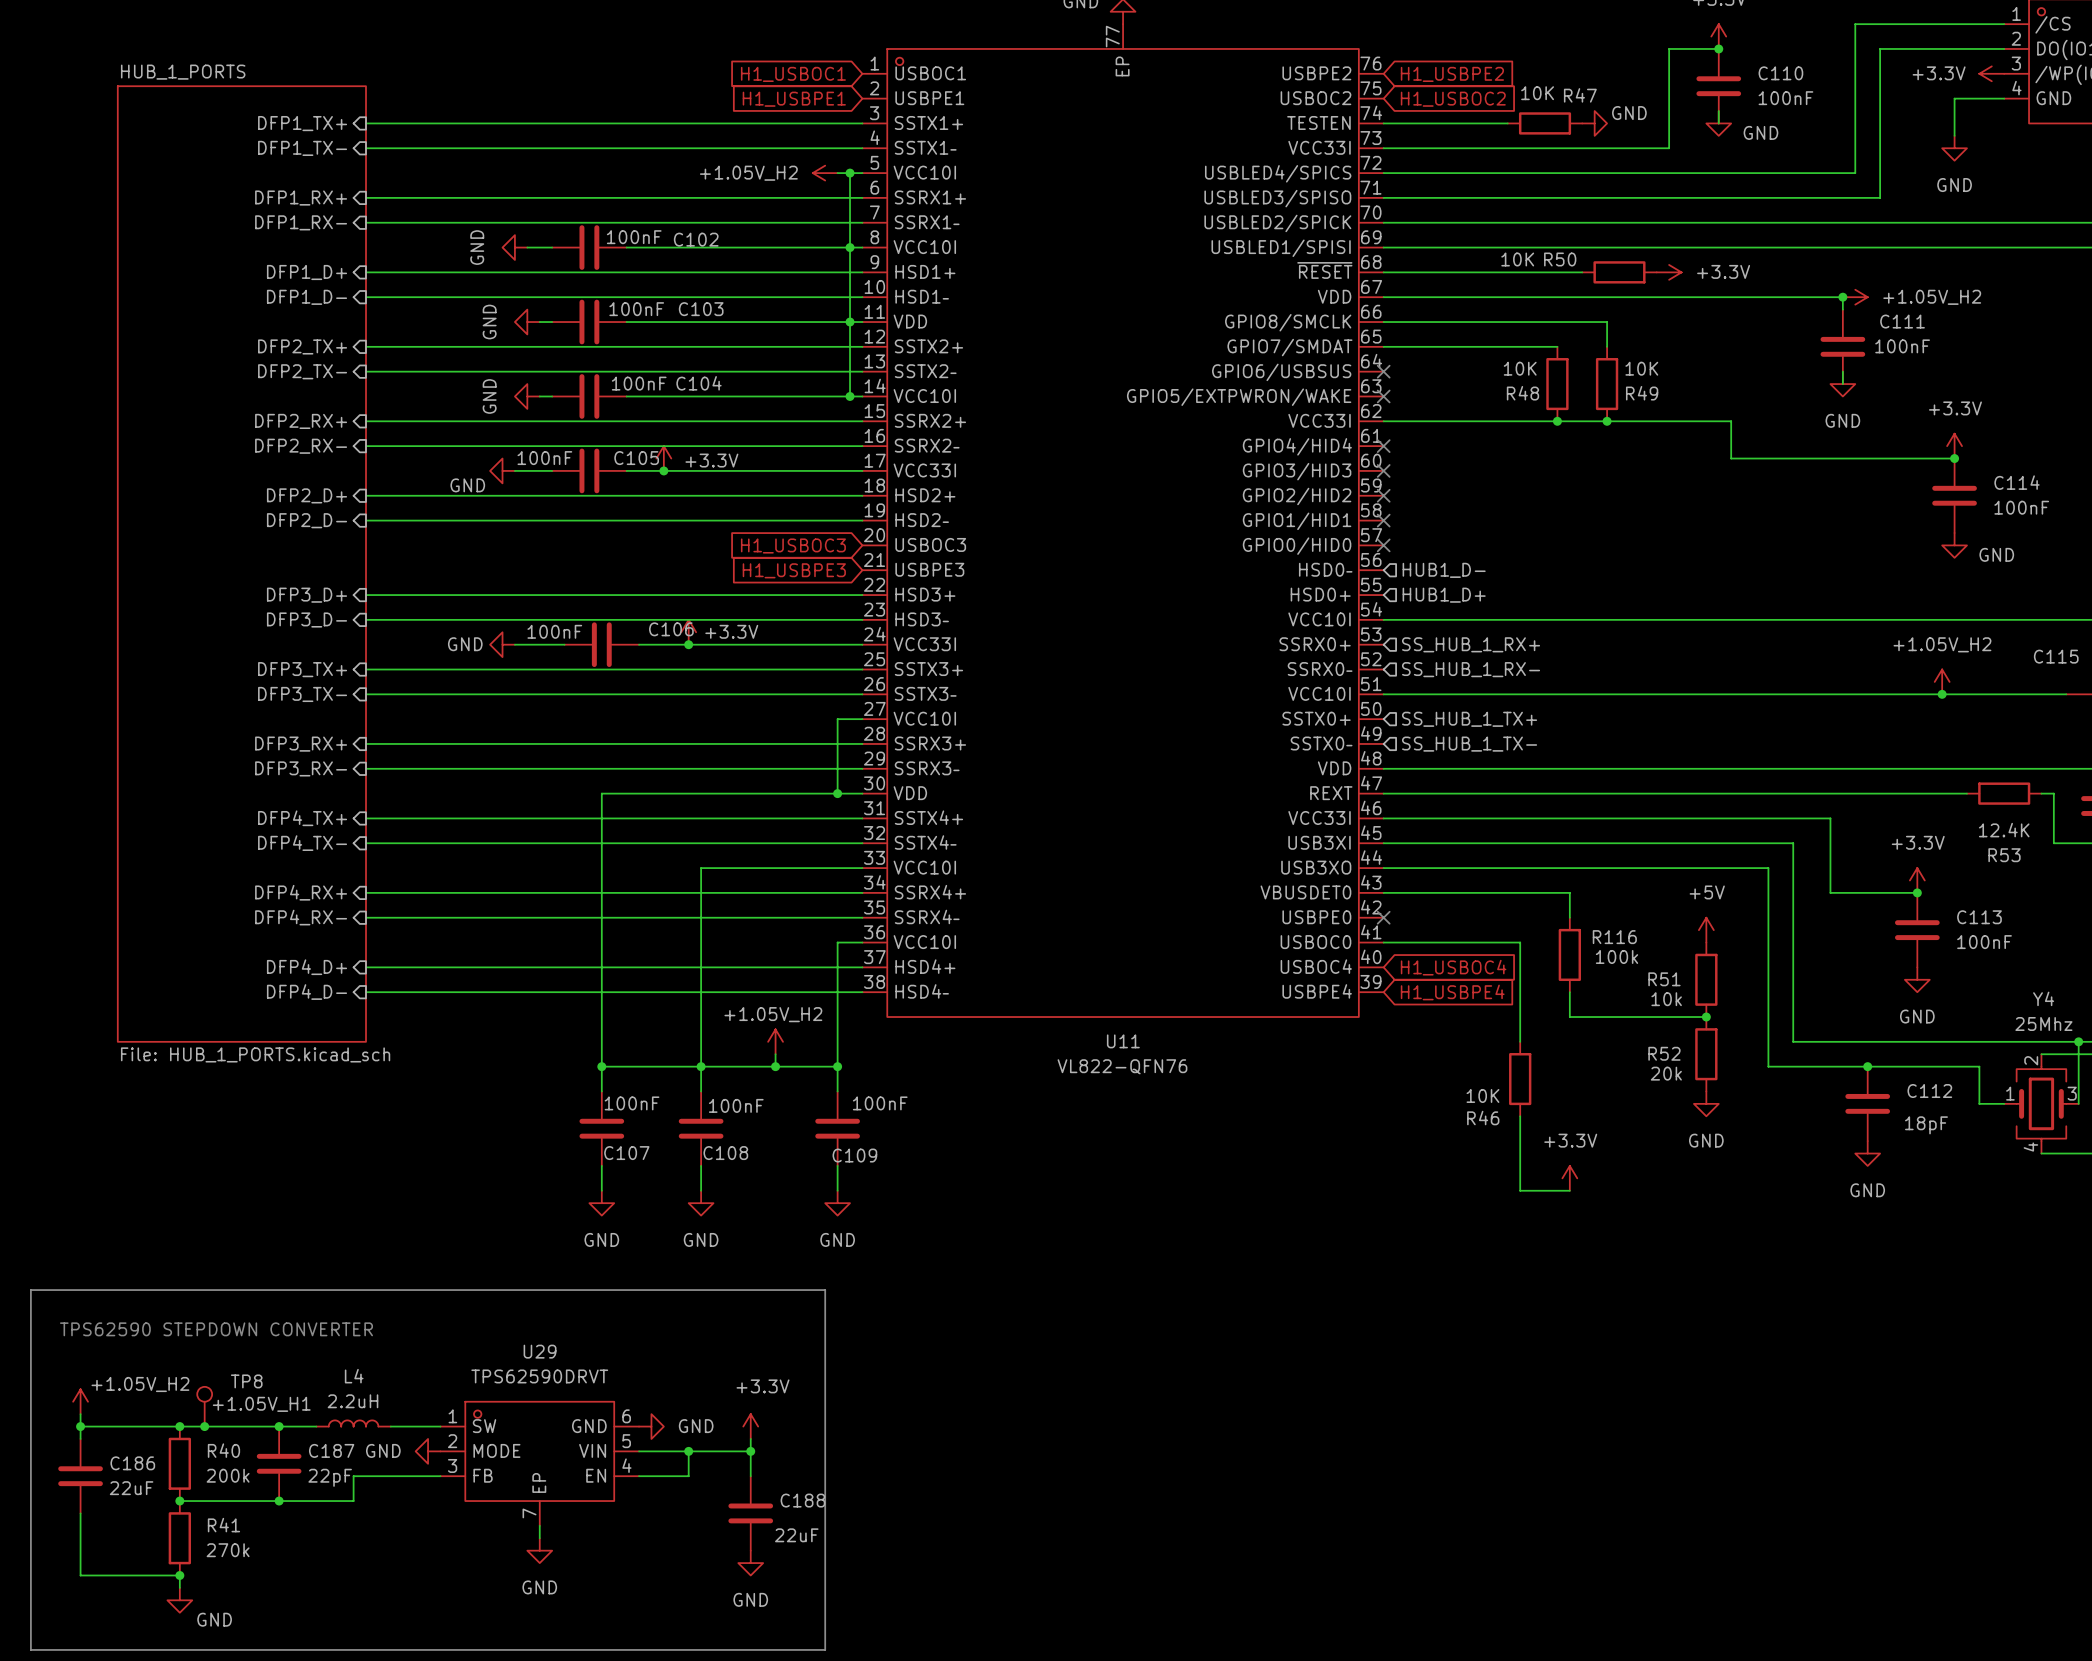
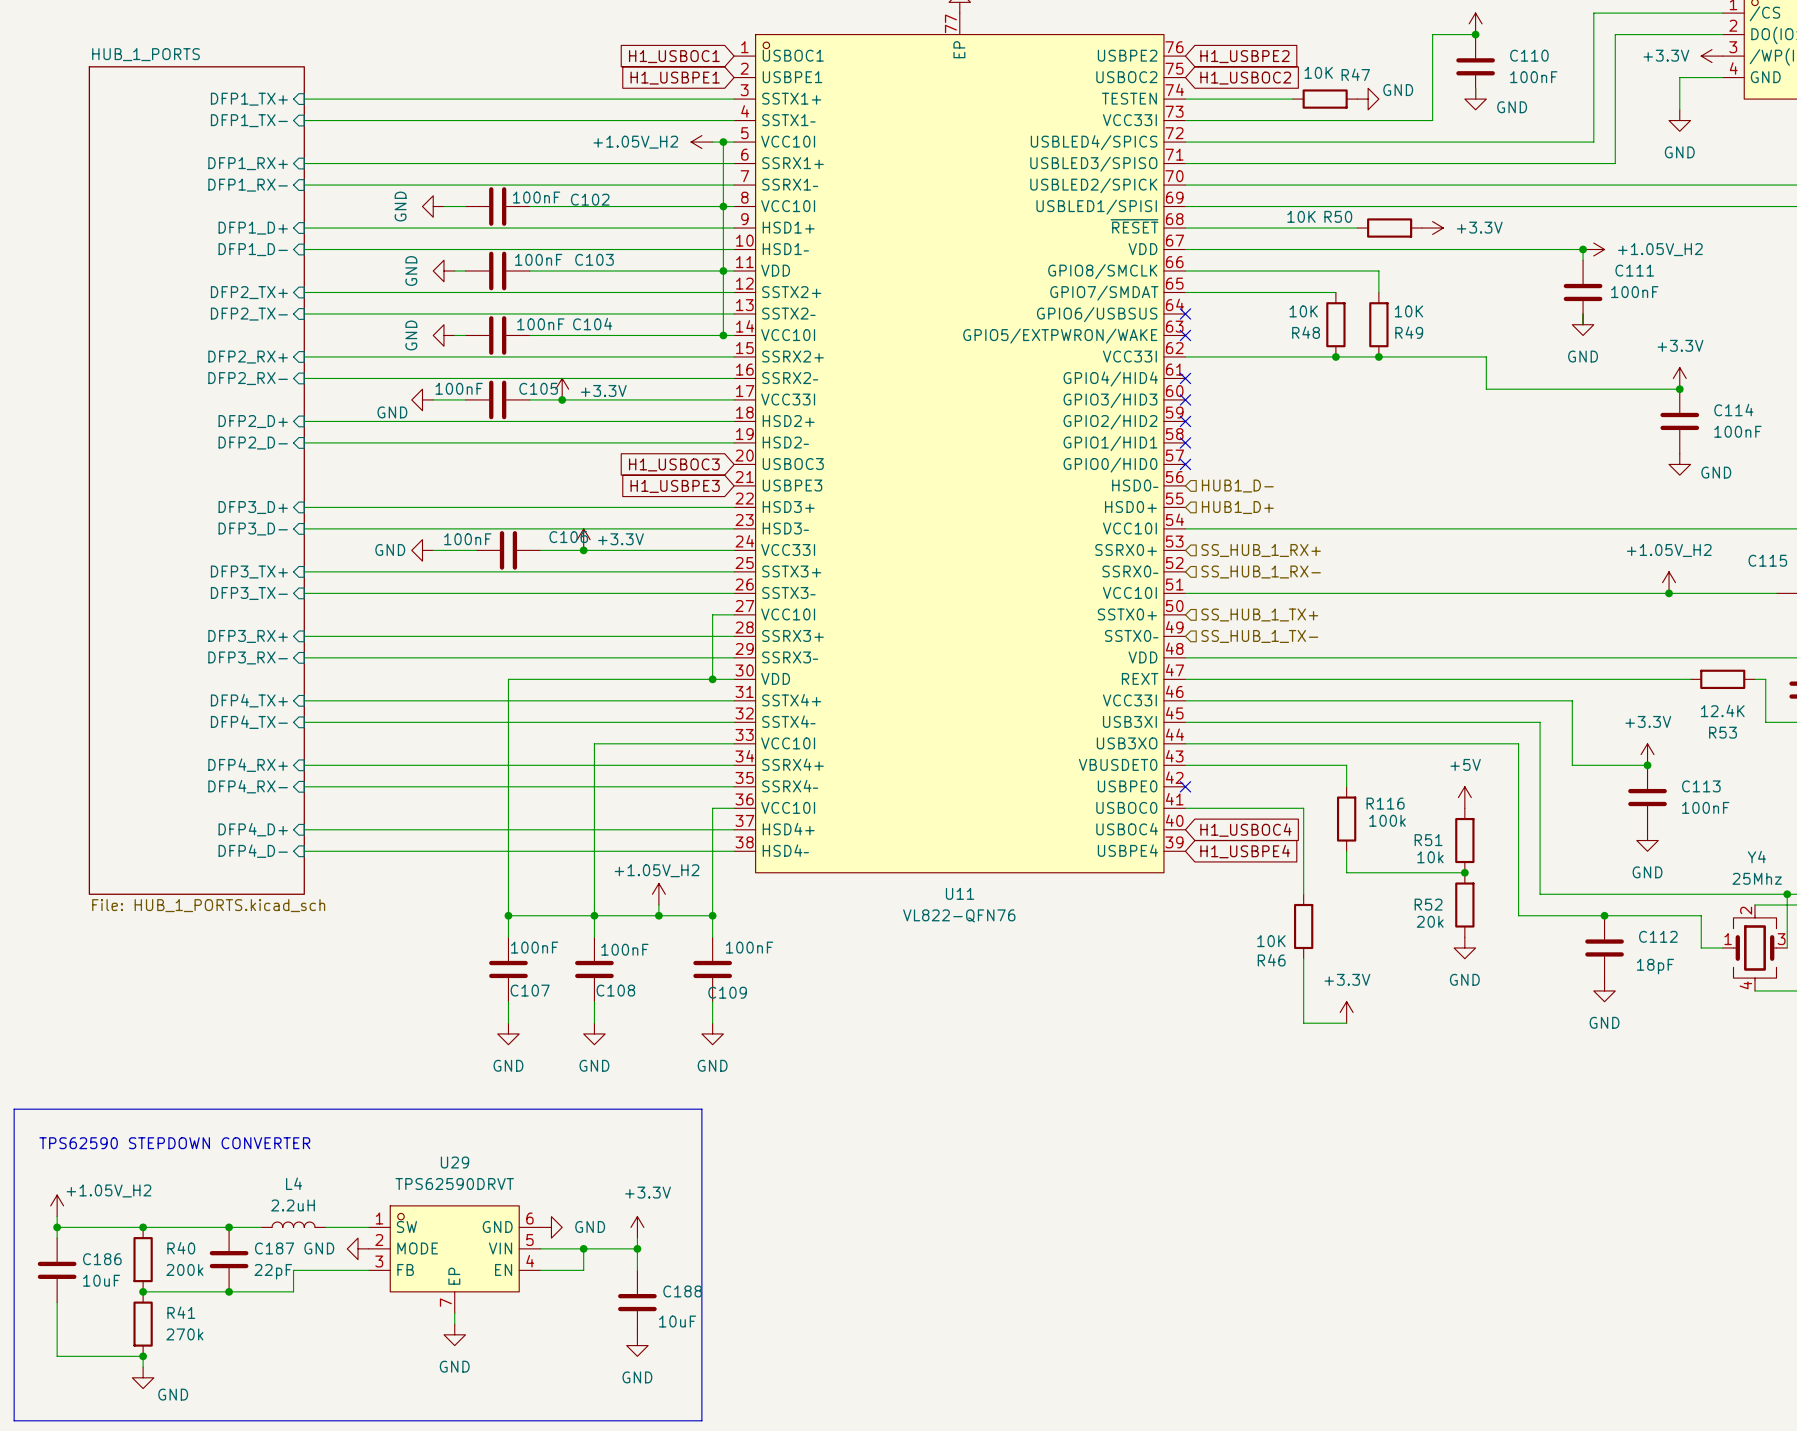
TP8: +1.05V_H1 (204, 1406) -> none
junction: (204, 1426) -> none
C186 value: 22uF (131, 1488) -> 10uF (101, 1280)
C188 value: 22uF (796, 1535) -> 10uF (677, 1321)

